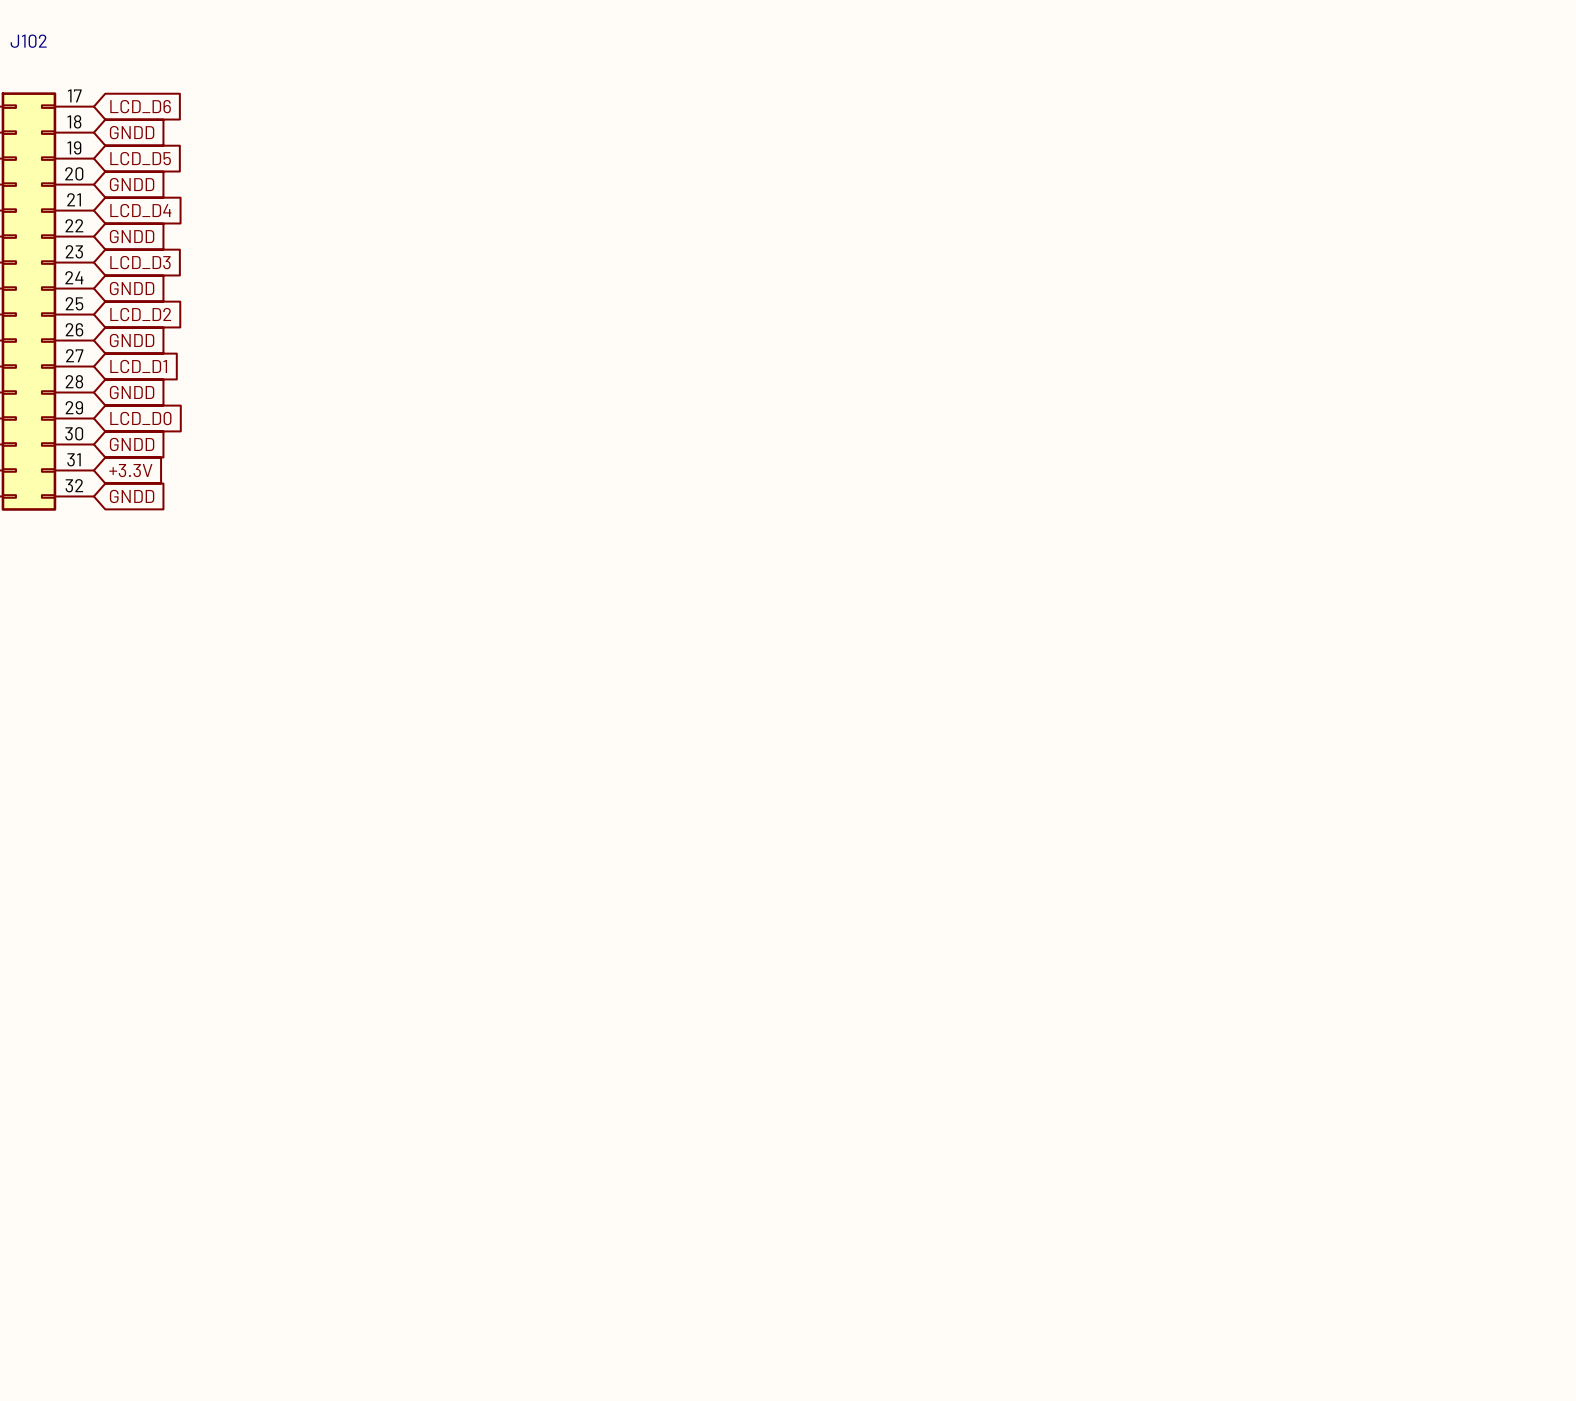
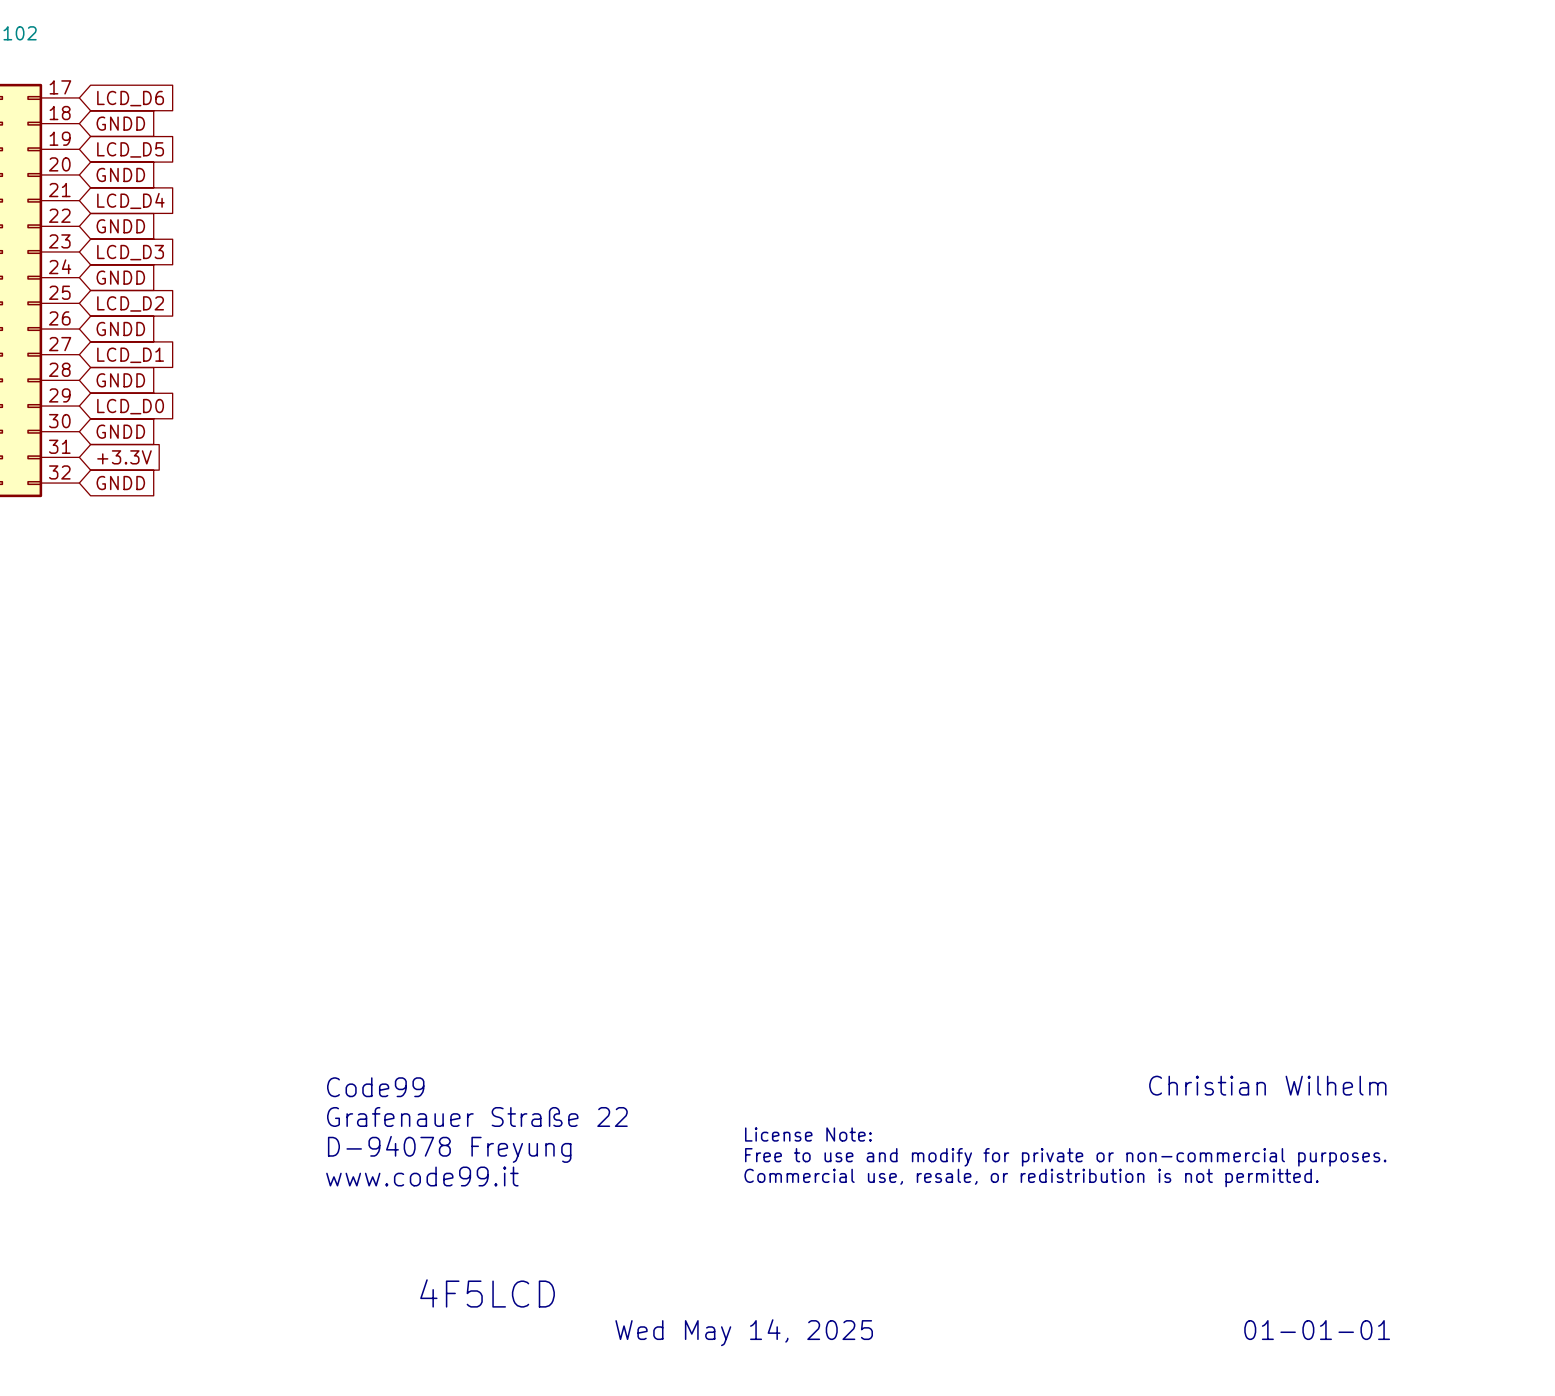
text: none -> Christian Wilhelm (1267, 1085)
text: none -> Code99 (375, 1087)
text: none -> Grafenauer Straße 22 (477, 1116)
text: none -> License Note: (808, 1134)
text: none -> D-94078 Freyung (449, 1149)
text: none -> Free to use and modify for private or non-commercial purposes. (1065, 1157)
text: none -> www.code99.it (422, 1176)
text: none -> Commercial use, resale, or redistribution is not permitted. (1031, 1177)
text: none -> 4F5LCD (487, 1293)
text: none -> 01-01-01 (1317, 1330)
text: none -> Wed May 14, 2025 (744, 1332)

